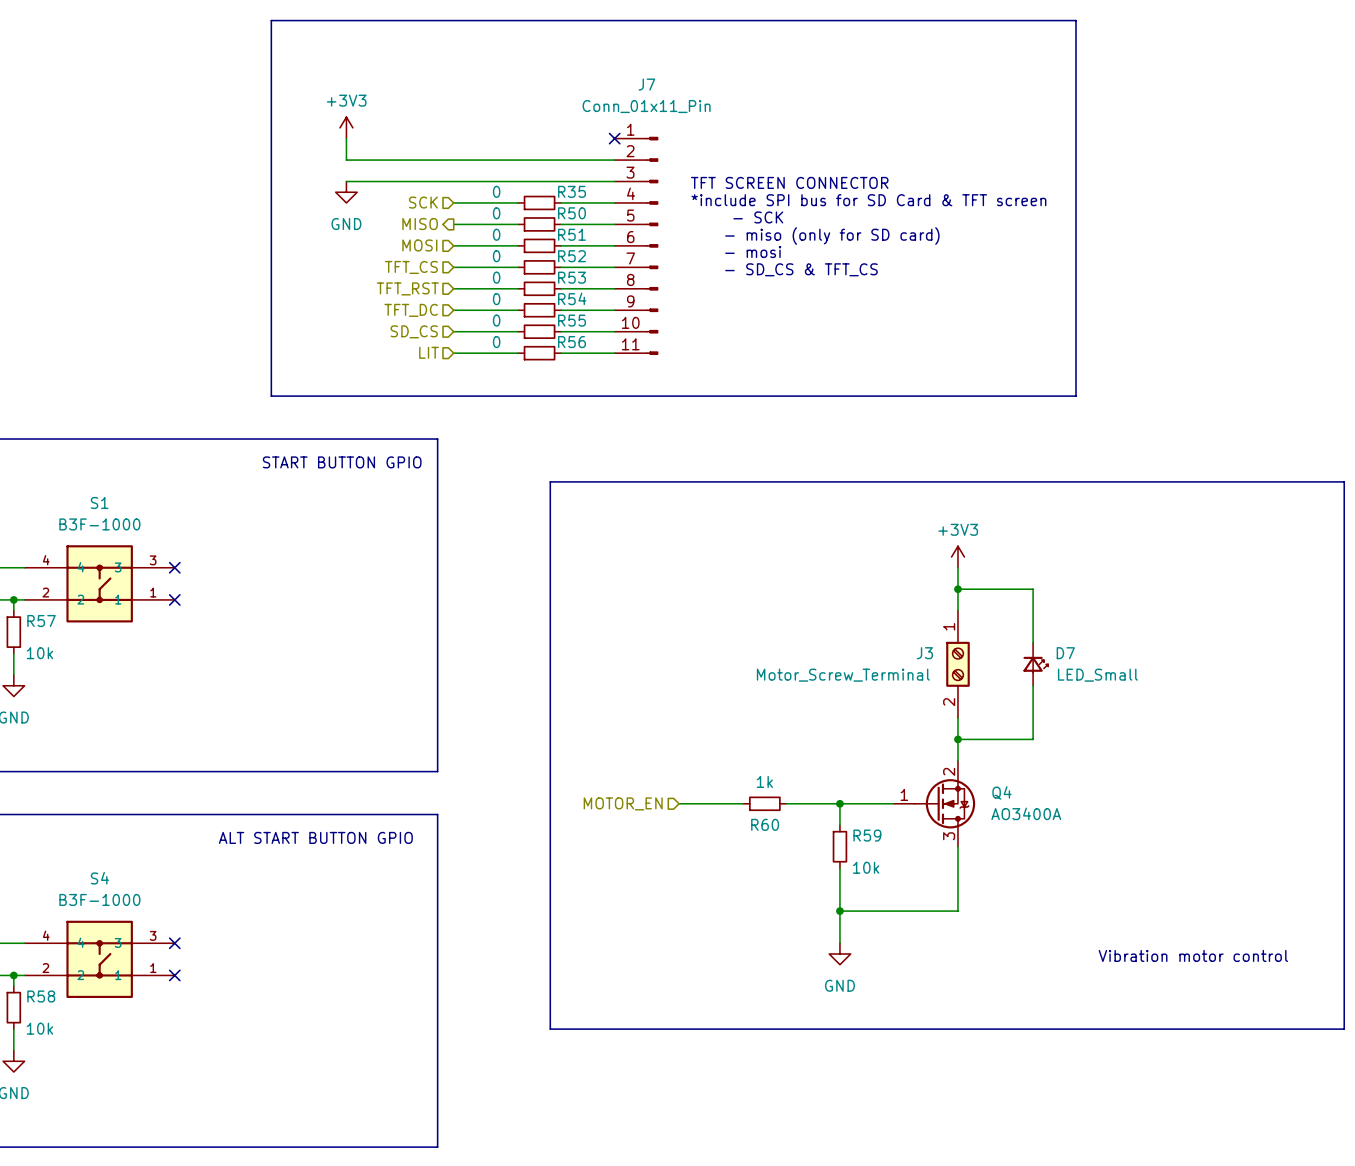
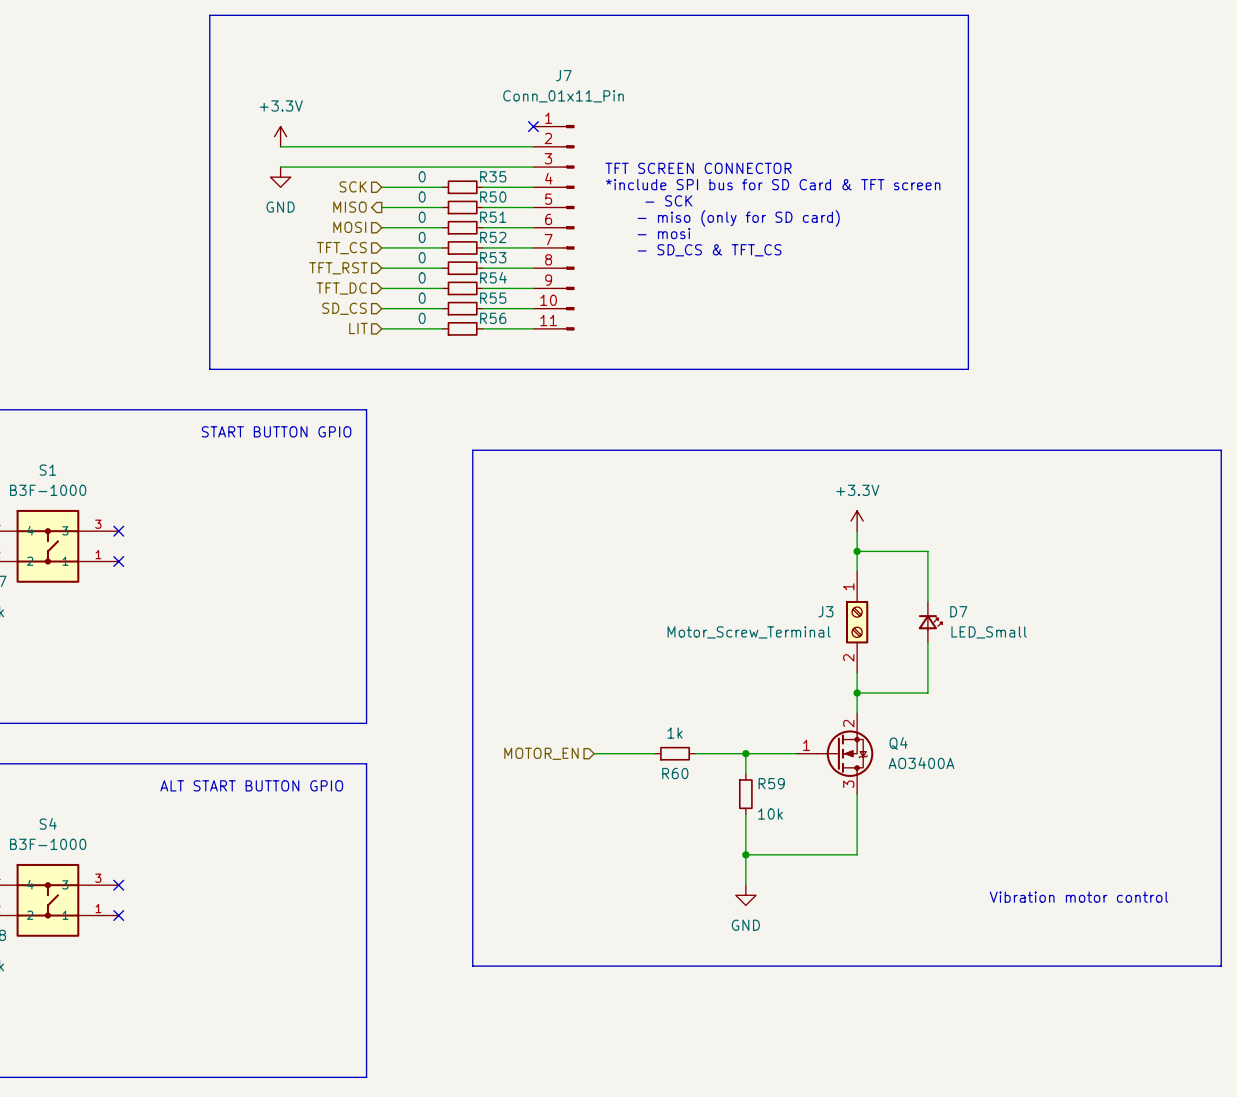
power symbol: +3V3 (346, 127) -> none
power symbol: none -> +3.3V (280, 136)
power symbol: +3V3 (957, 557) -> +3.3V (857, 521)

